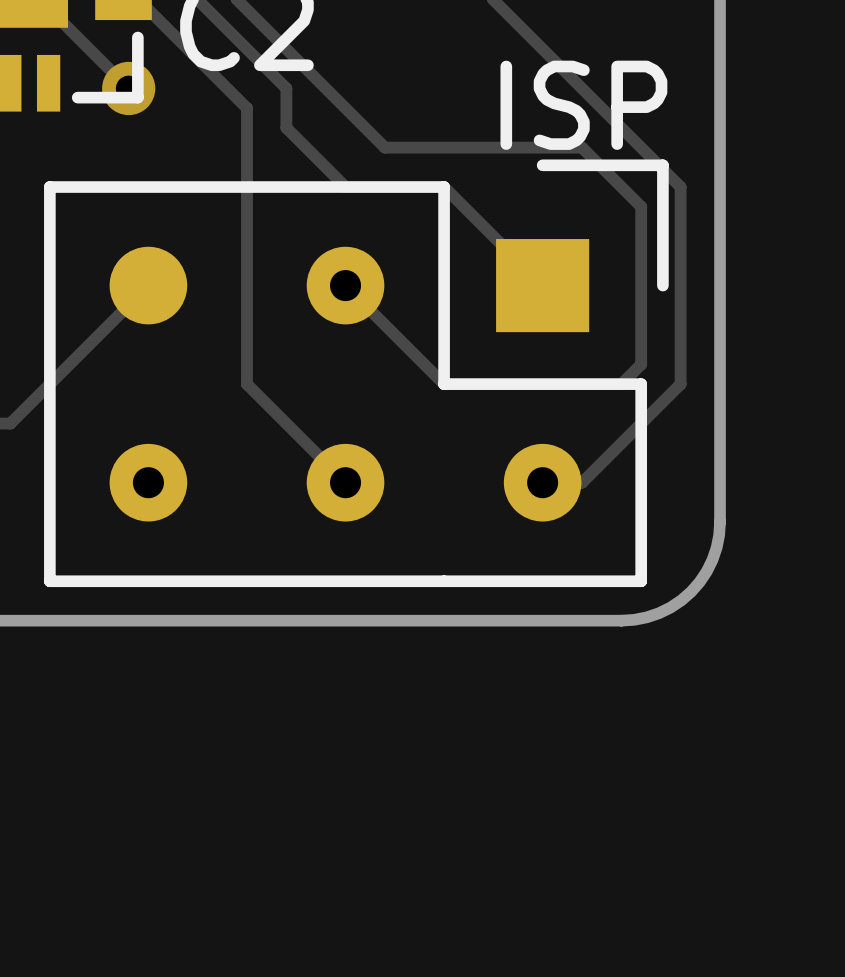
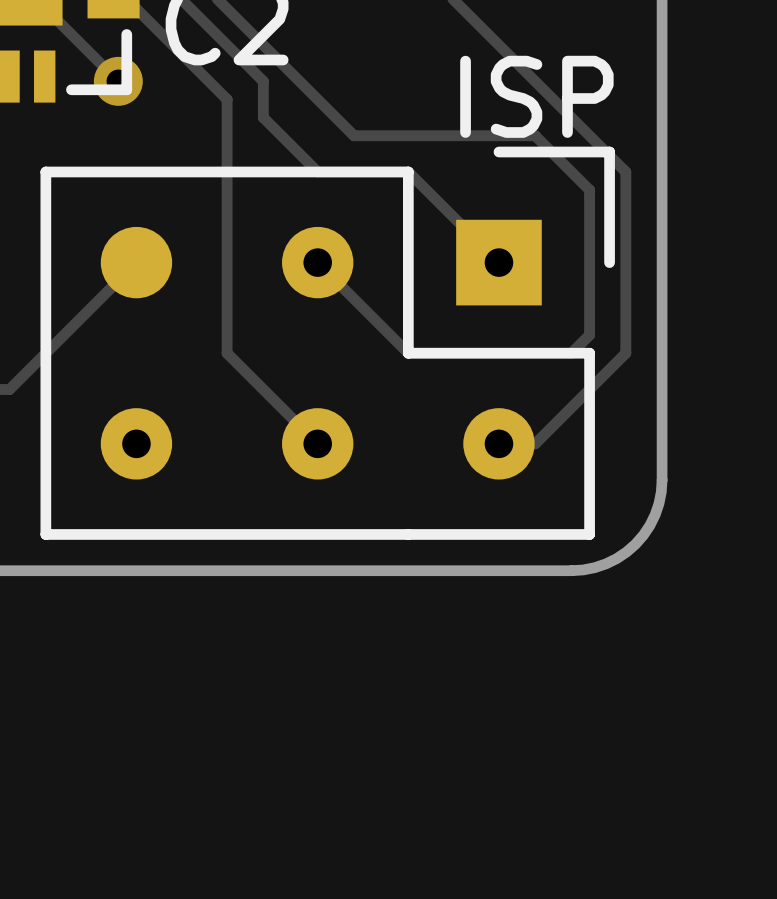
part footprint: [44, 159, 669, 588] -> [40, 146, 615, 540]

